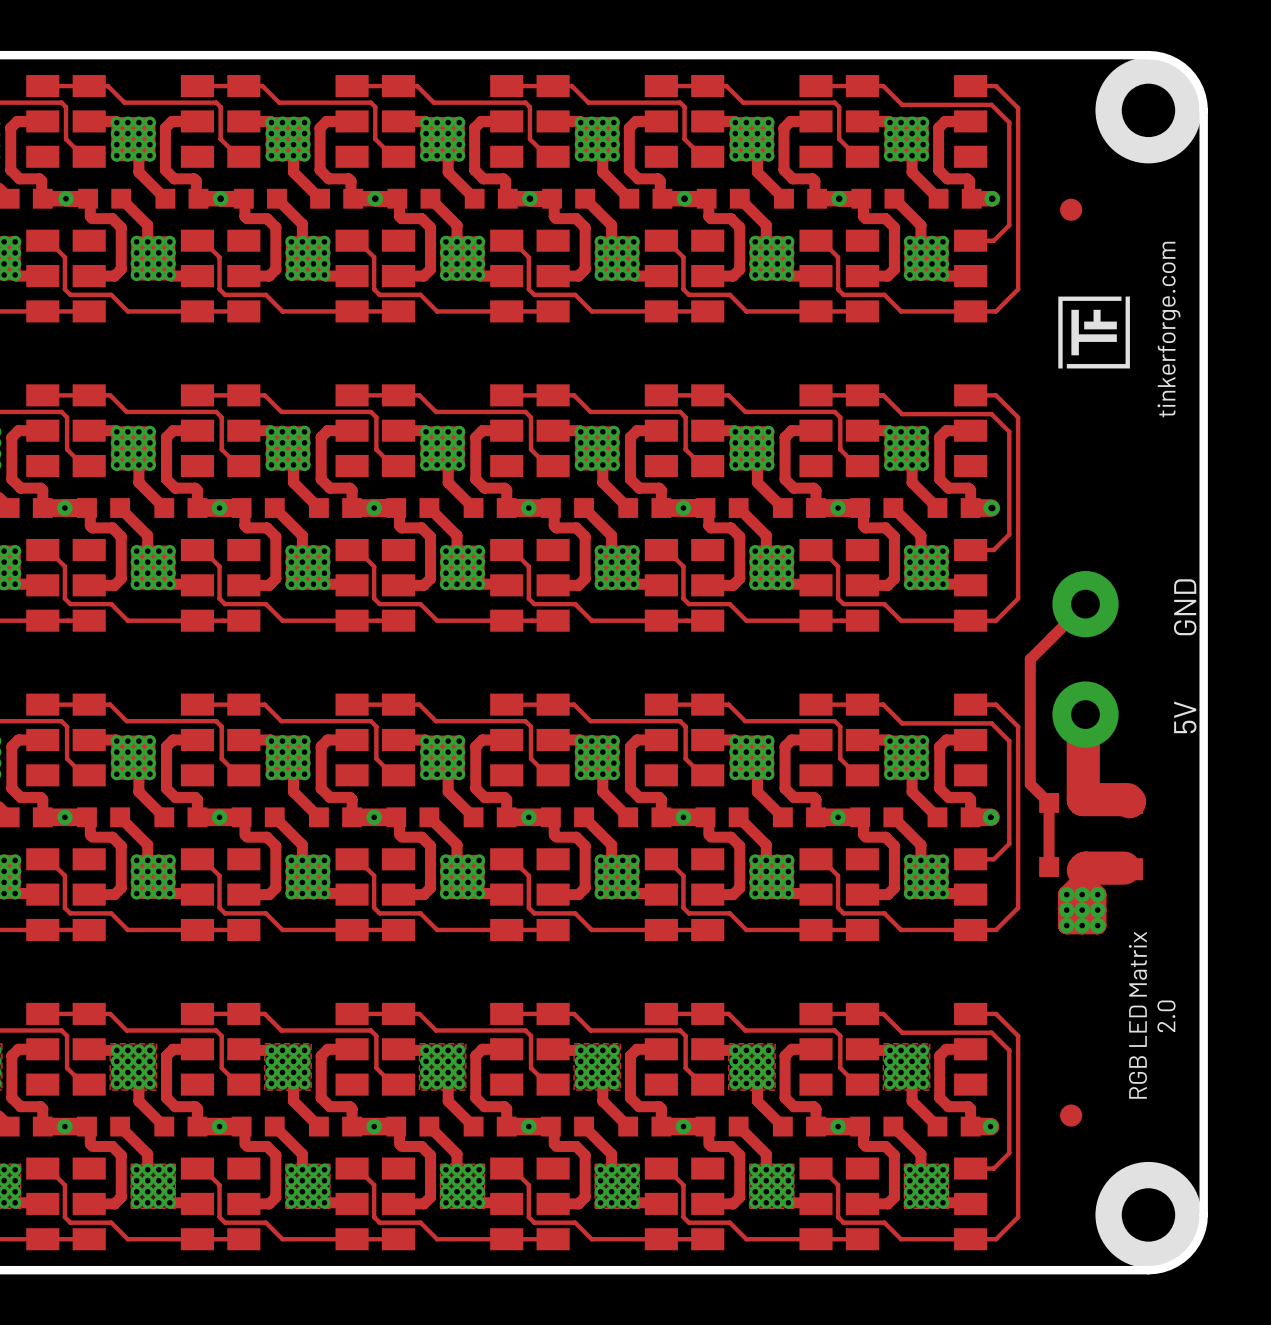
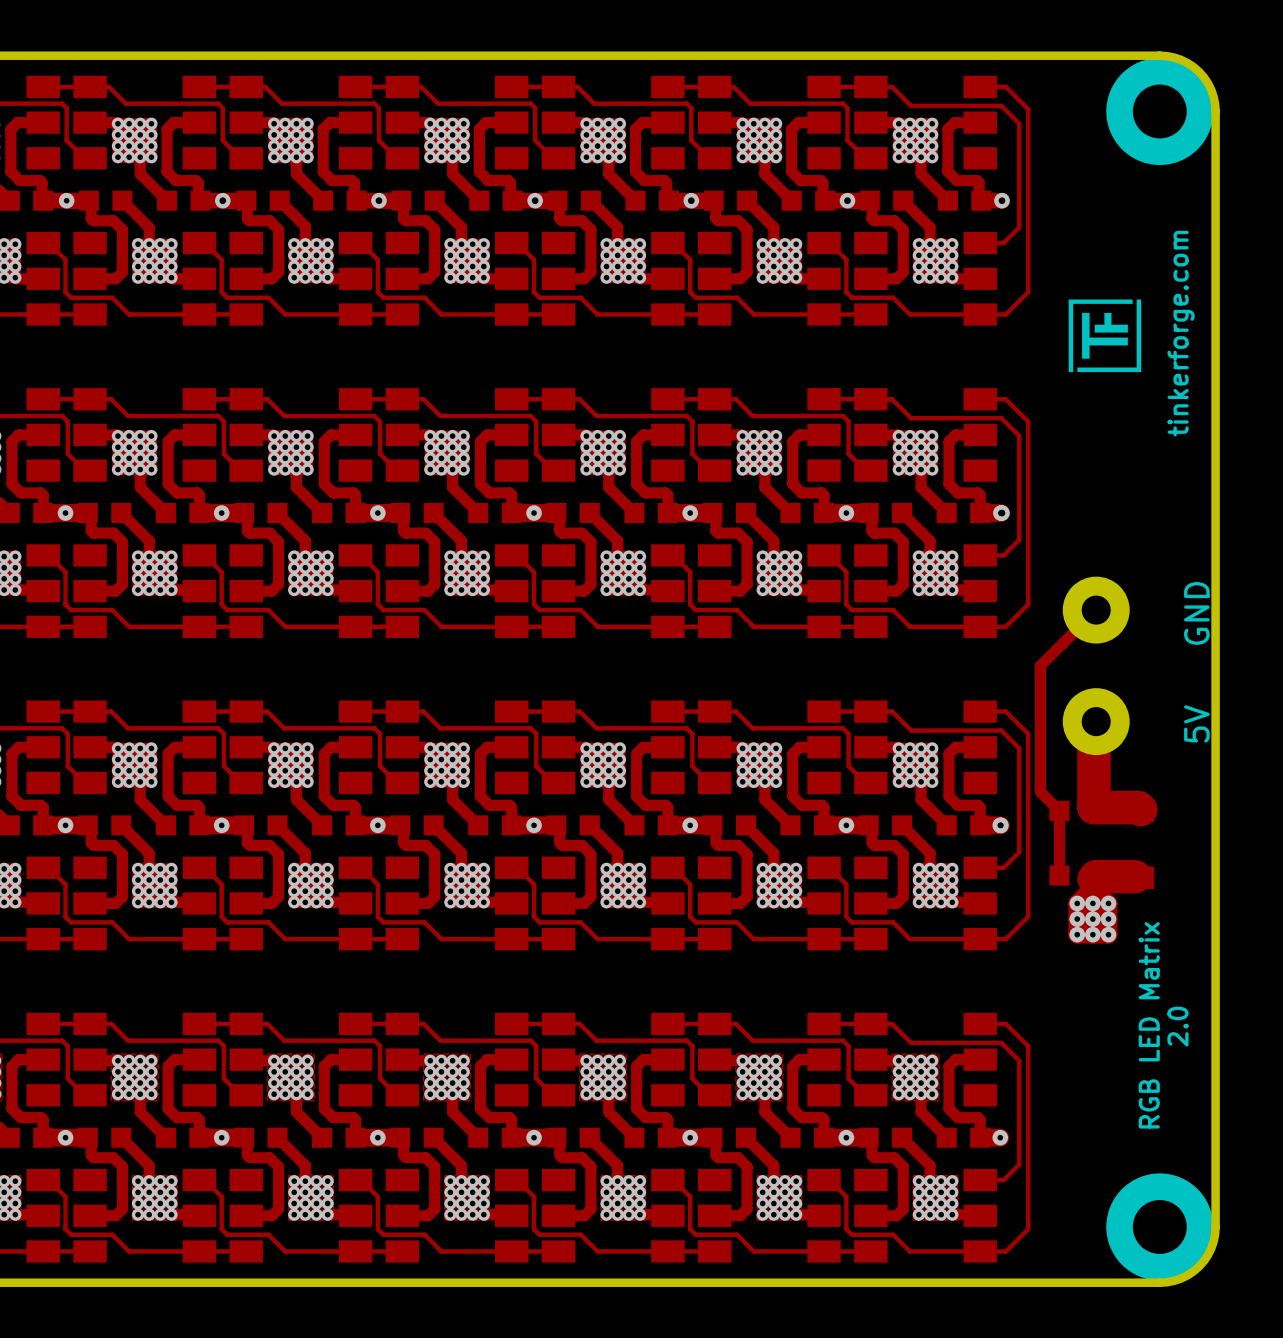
part: (1071, 209) -> none
part: (1071, 1115) -> none

